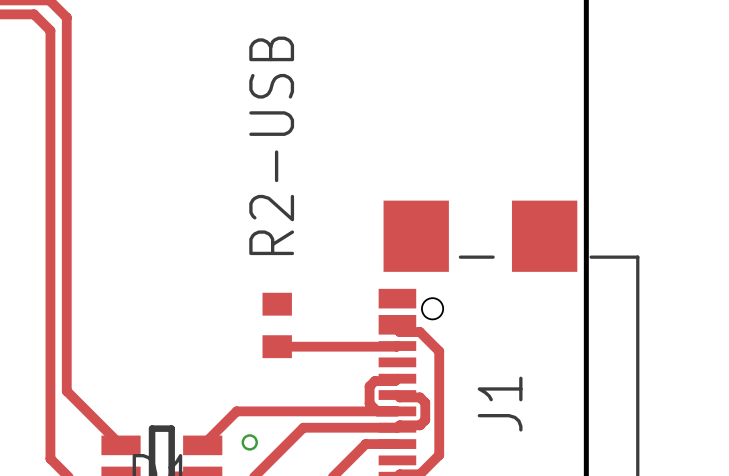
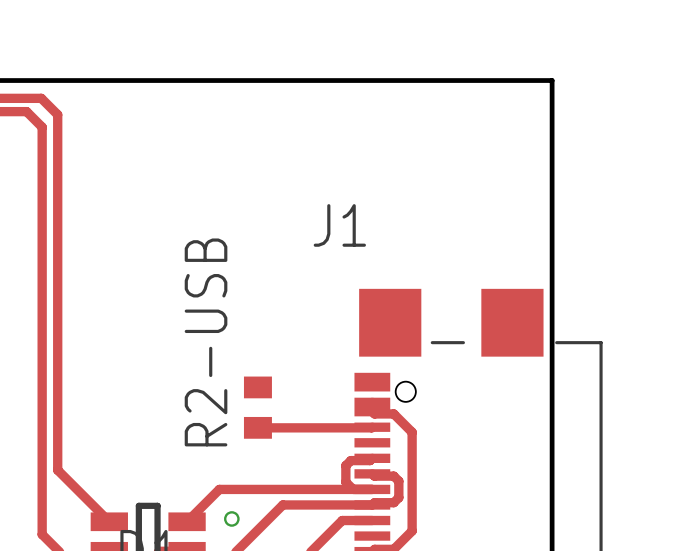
R2-USB name position: R2-USB (271, 145) -> R2-USB (206, 342)
J1 name rotation: 0° (500, 404) -> 90° clockwise (339, 225)
J1 name position: J1 (500, 404) -> J1 (339, 225)

